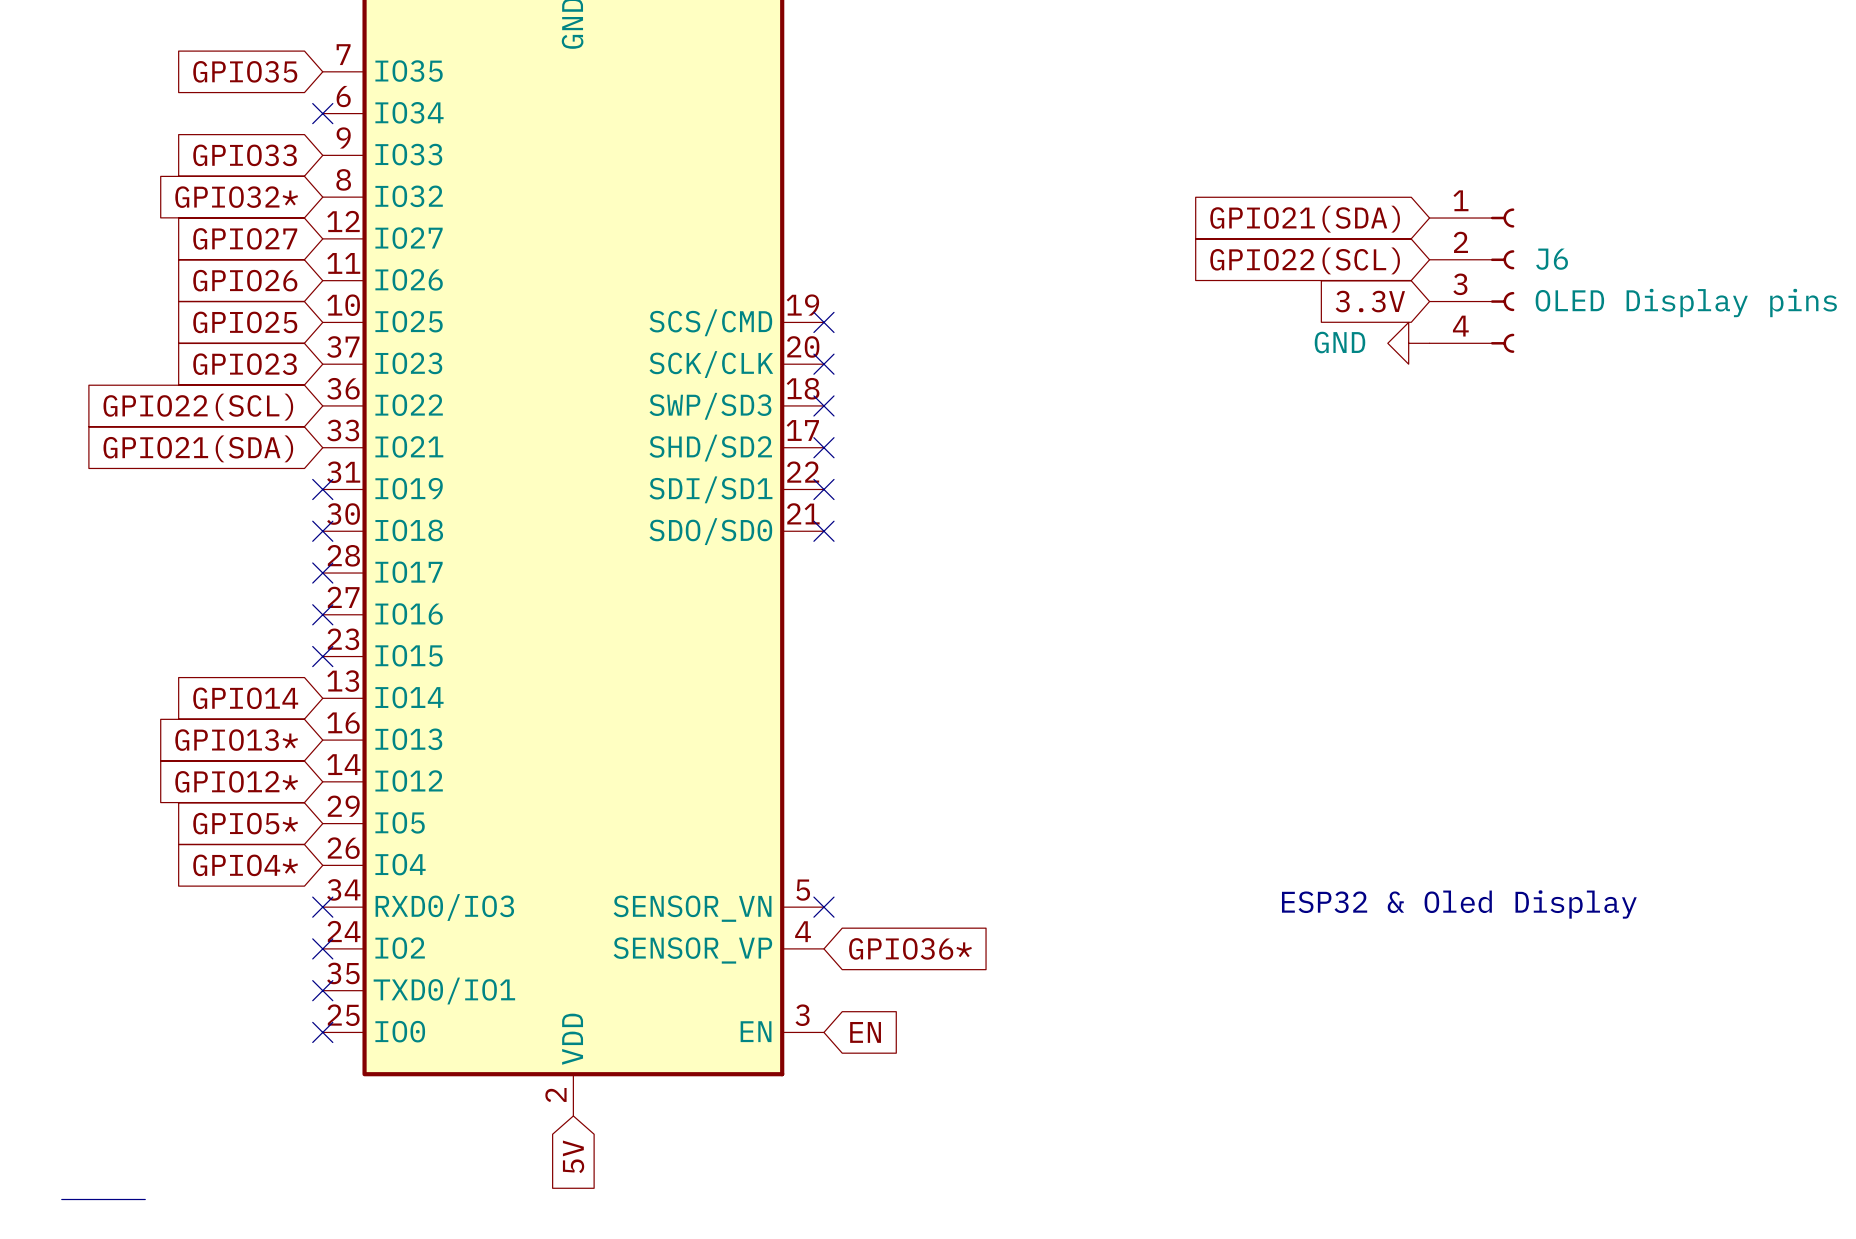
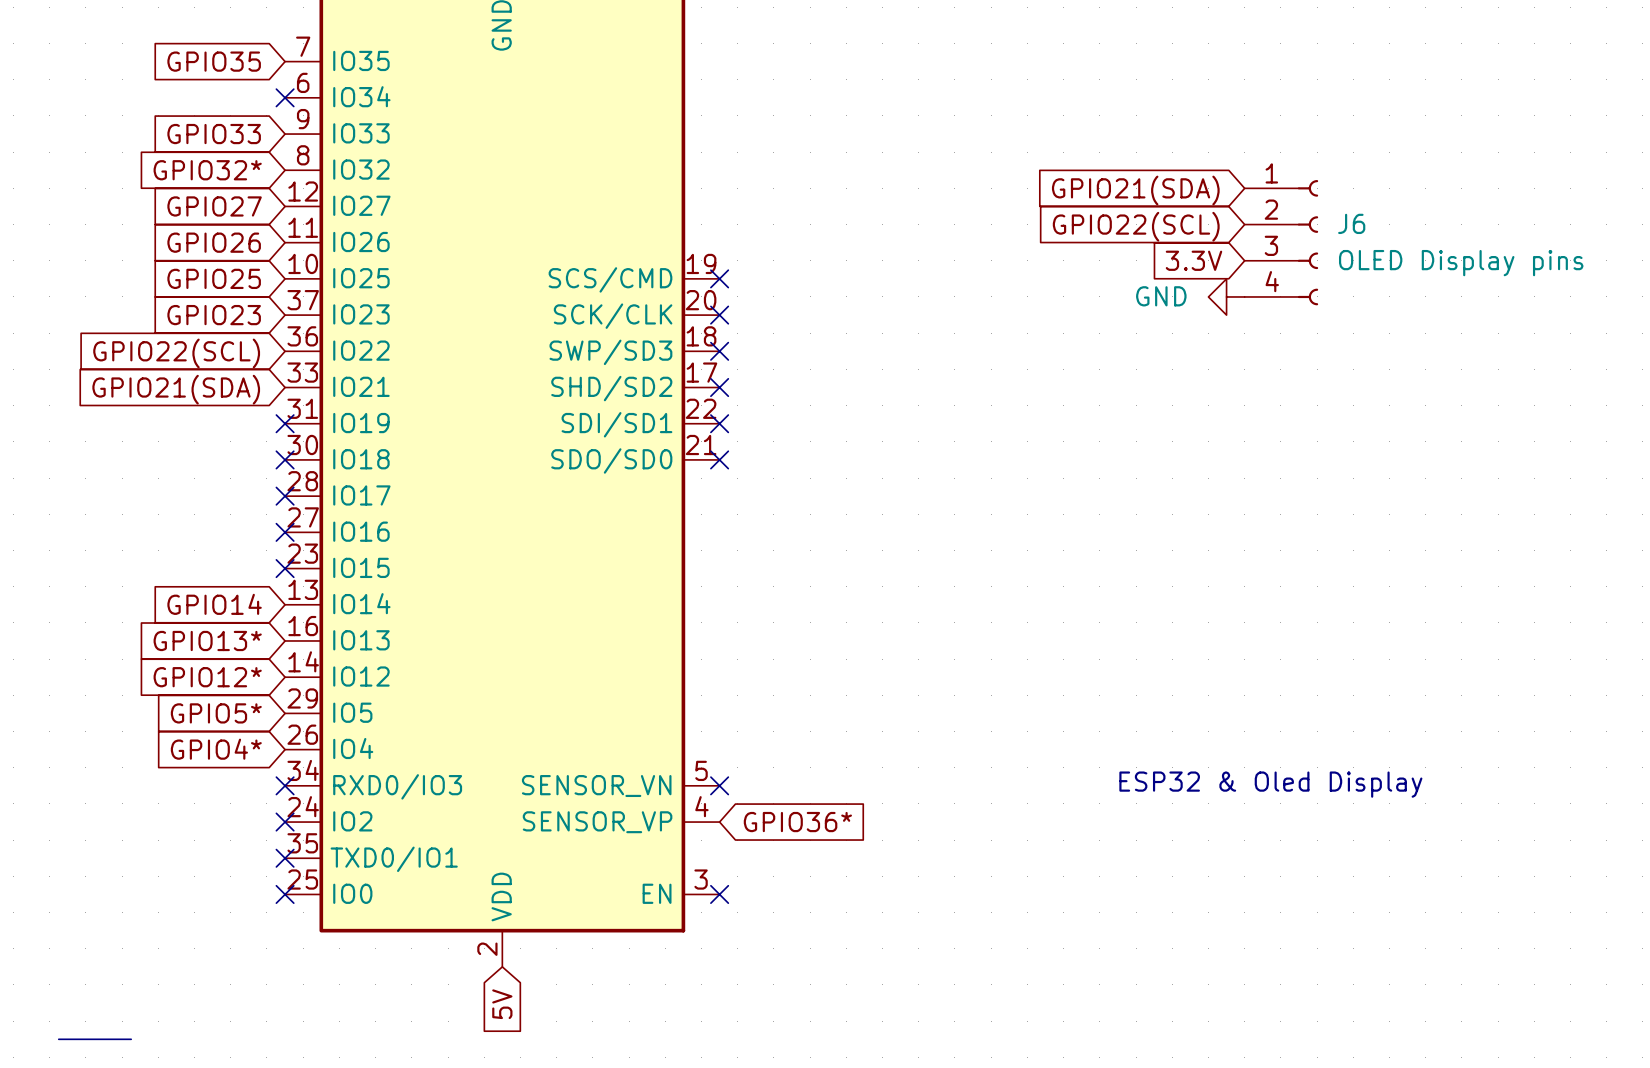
no-connect mark: none -> (719, 894)
global label: EN (865, 1032) -> none

